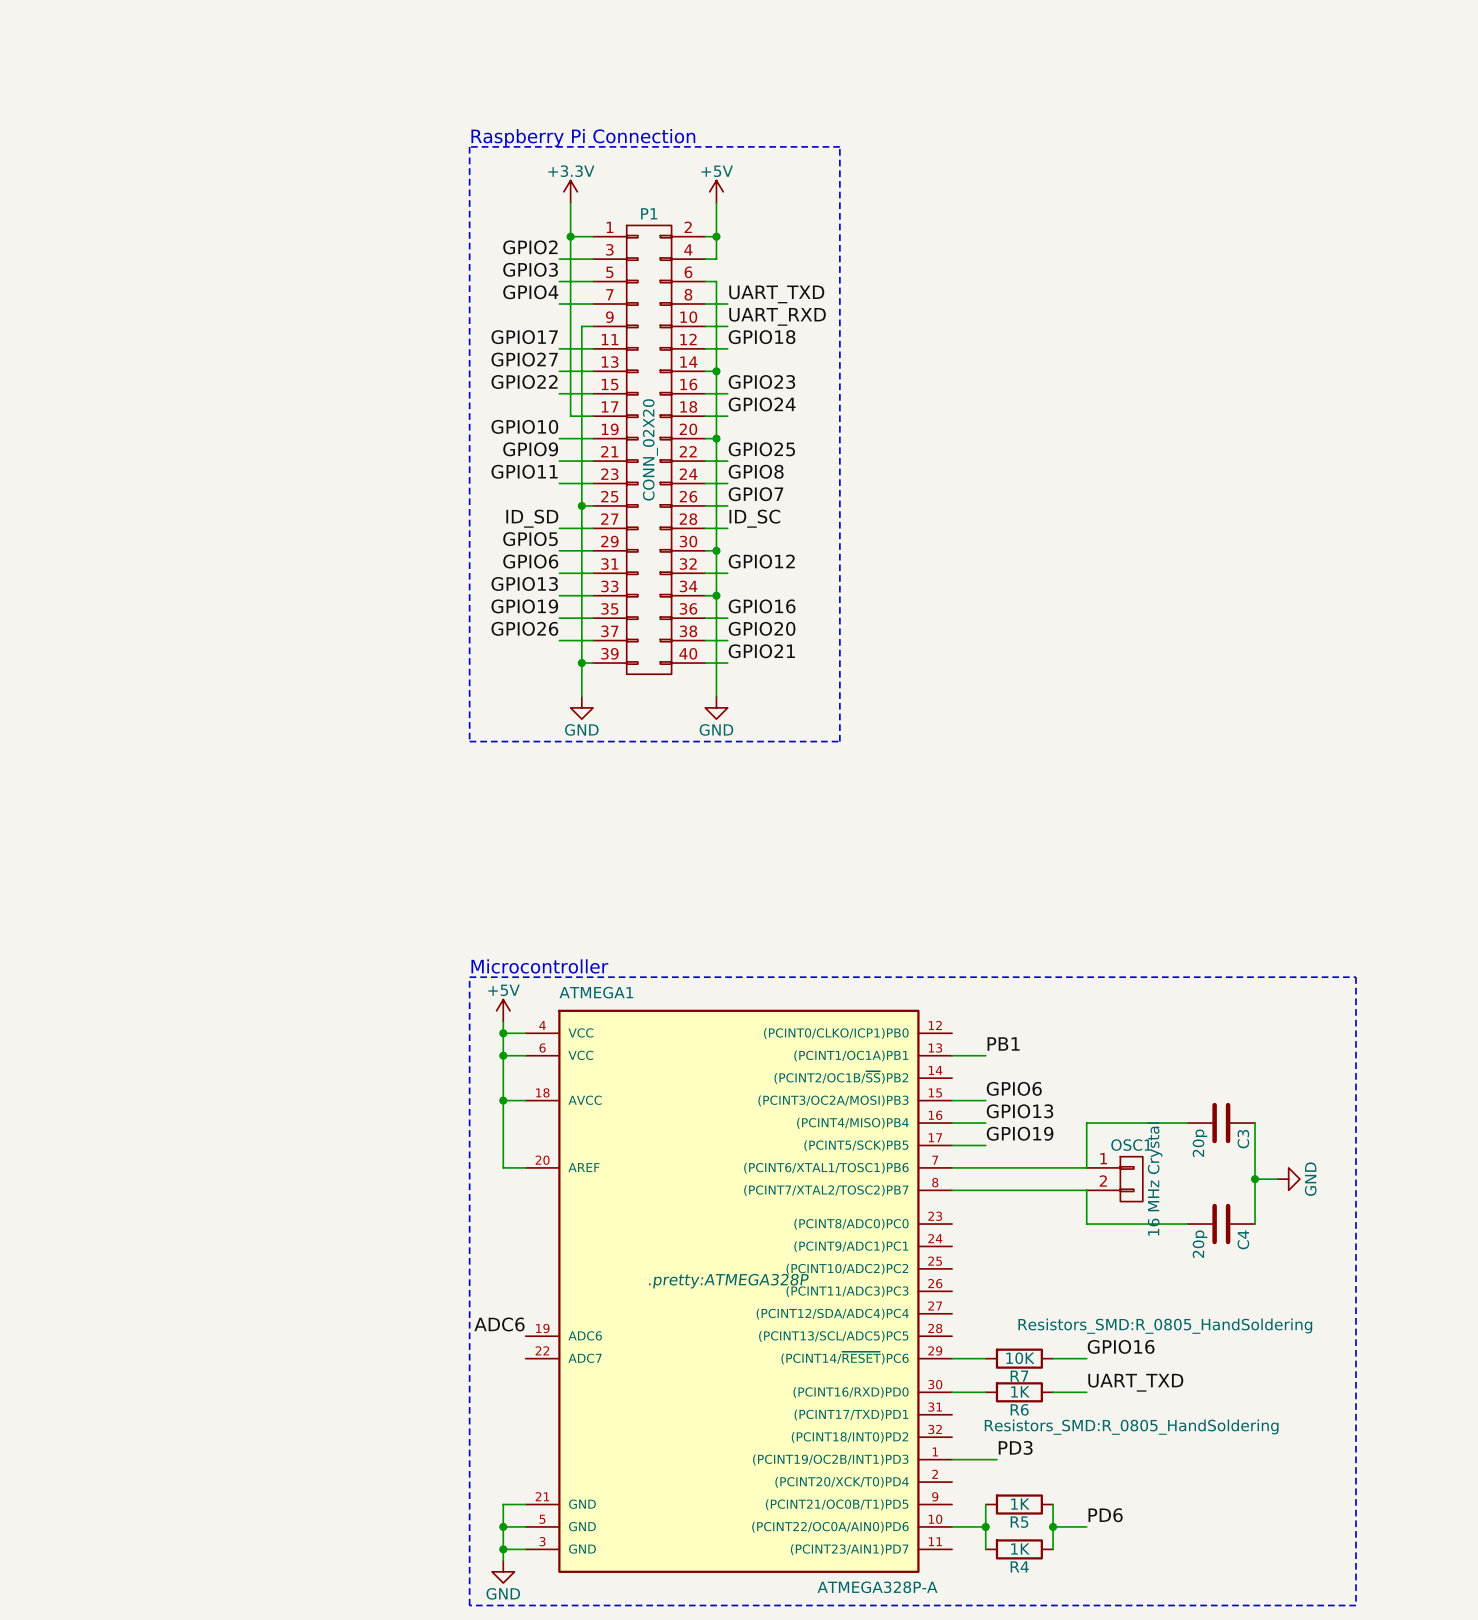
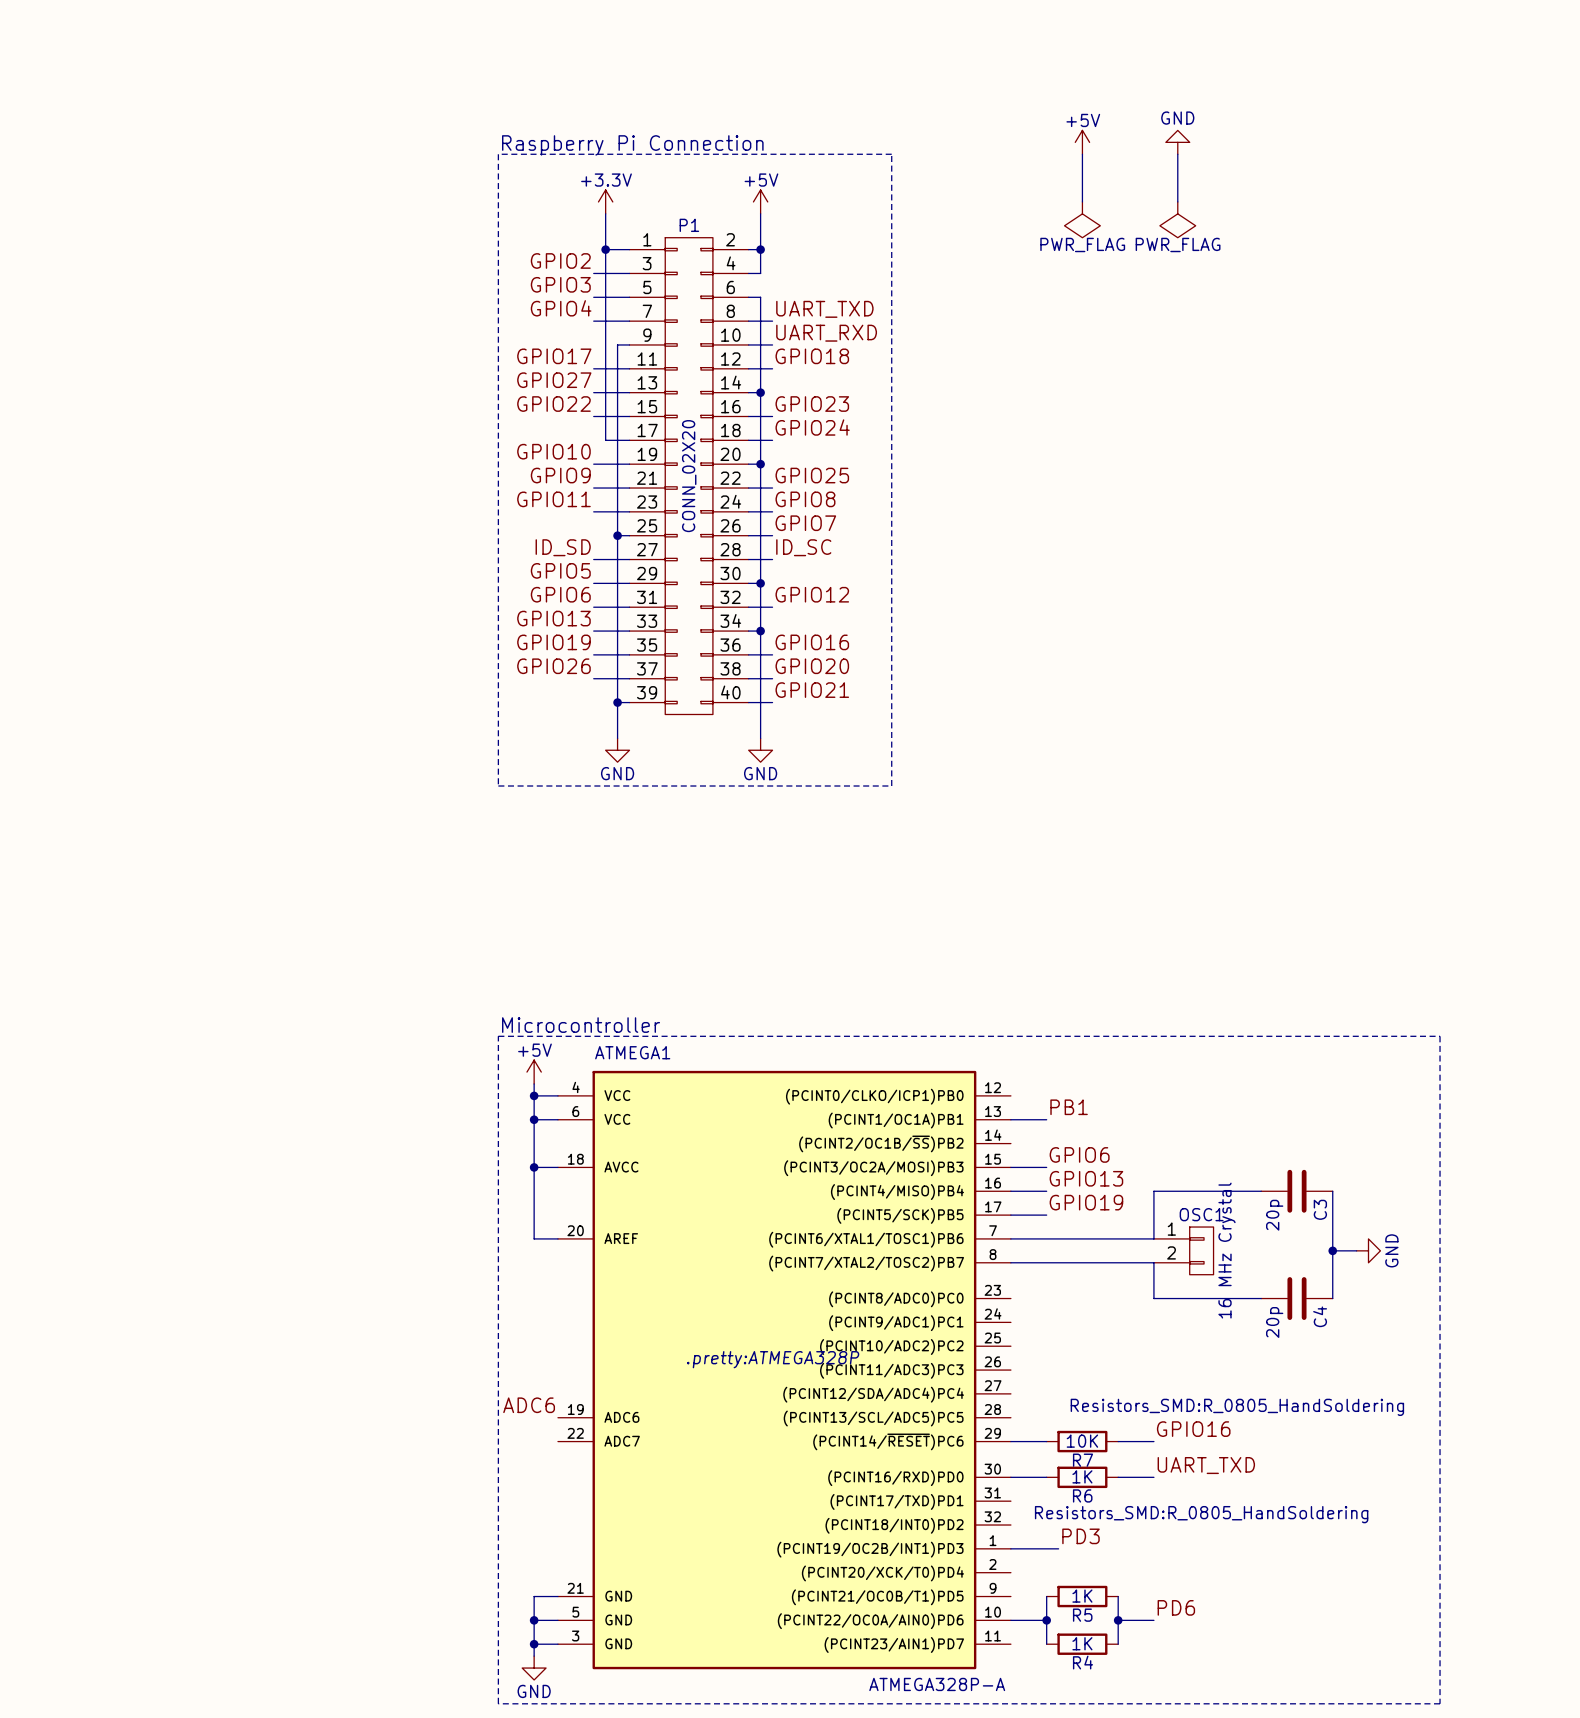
power symbol: none -> +5V (1082, 142)
power symbol: none -> GND (1177, 142)
wire: none -> (1082, 154) (1082, 201)
wire: none -> (1177, 154) (1177, 201)
power symbol: none -> PWR_FLAG (1082, 219)
power symbol: none -> PWR_FLAG (1177, 219)

